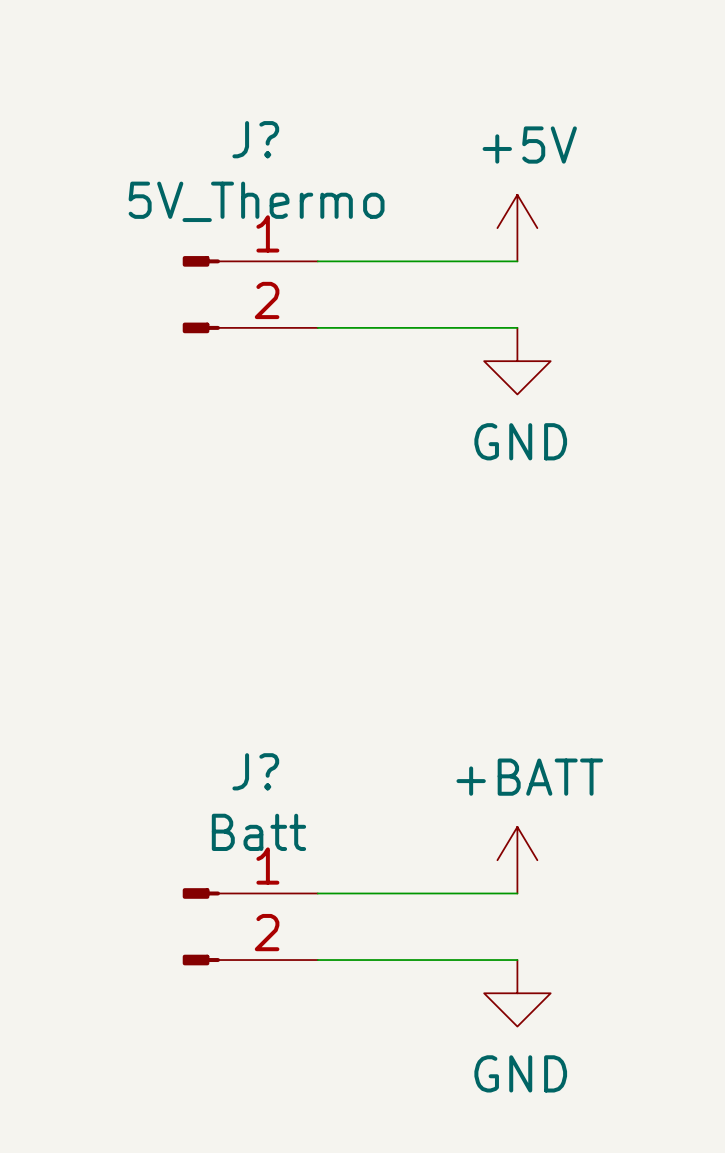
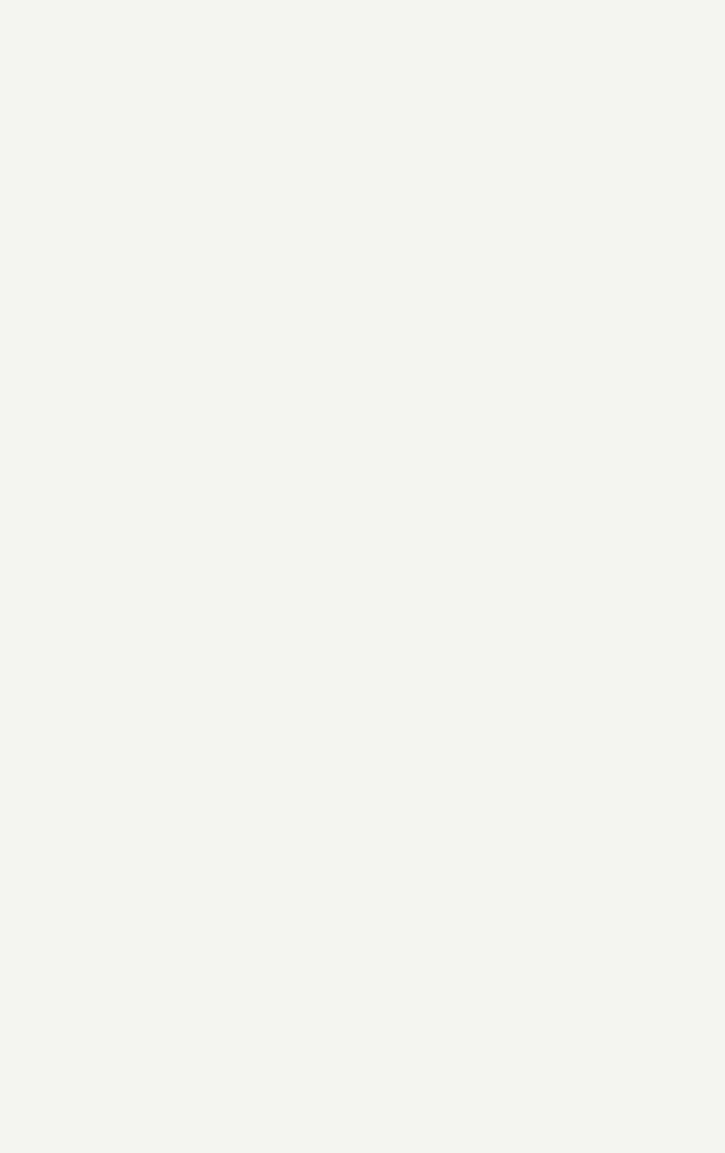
power symbol: +5V (517, 228) -> none
wire: (317, 261) (517, 261) -> none
J?: 5V_Thermo (250, 294) -> none
wire: (317, 327) (517, 327) -> none
power symbol: GND (517, 361) -> none
power symbol: +BATT (517, 860) -> none
wire: (317, 893) (517, 893) -> none
J?: Batt (250, 926) -> none
wire: (317, 960) (517, 960) -> none
power symbol: GND (517, 993) -> none

